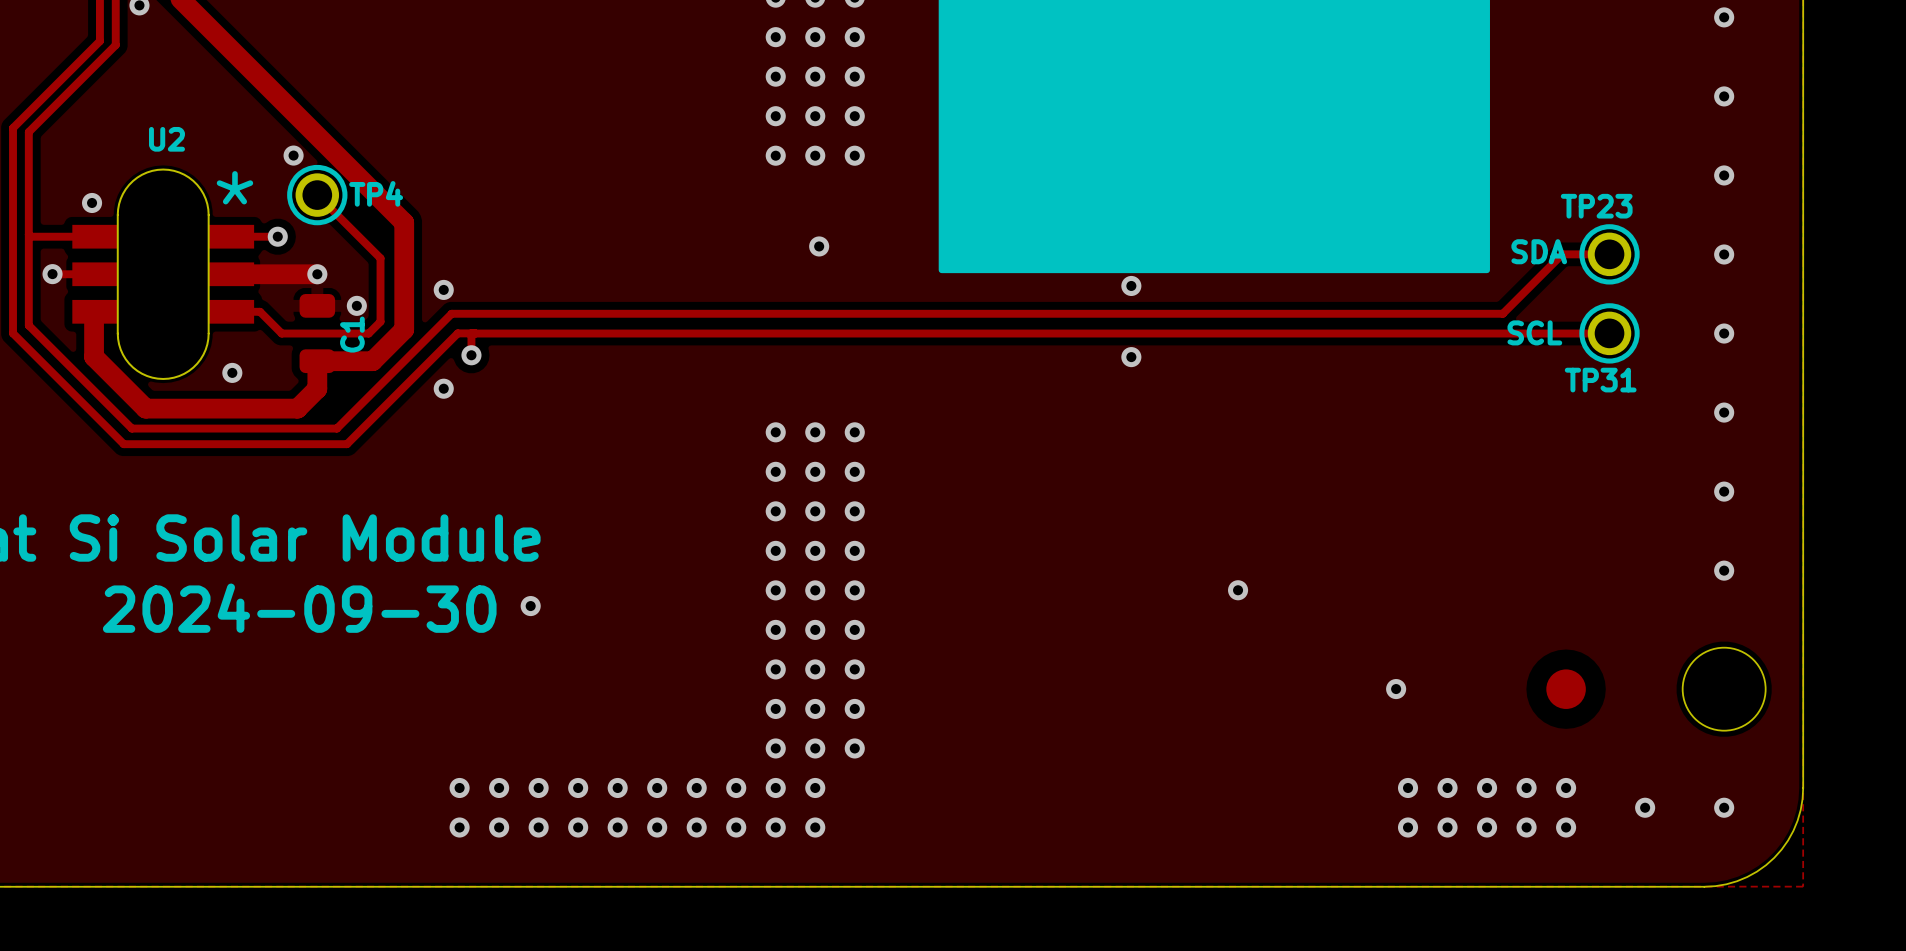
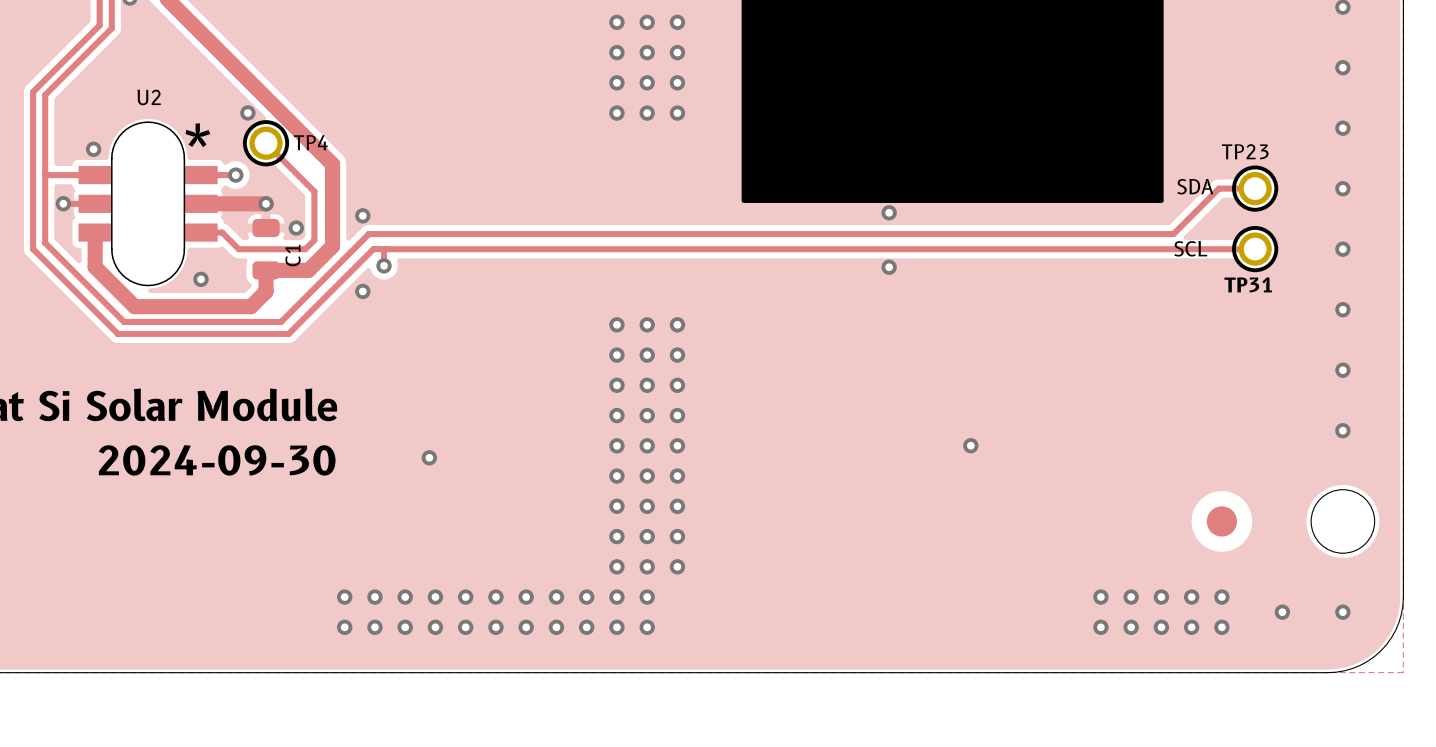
U2 footprint: [72, 168, 255, 380] -> [78, 121, 218, 287]
via: (819, 246) -> none
via: (1396, 689) -> none
via: none -> (344, 597)
via: none -> (344, 627)

